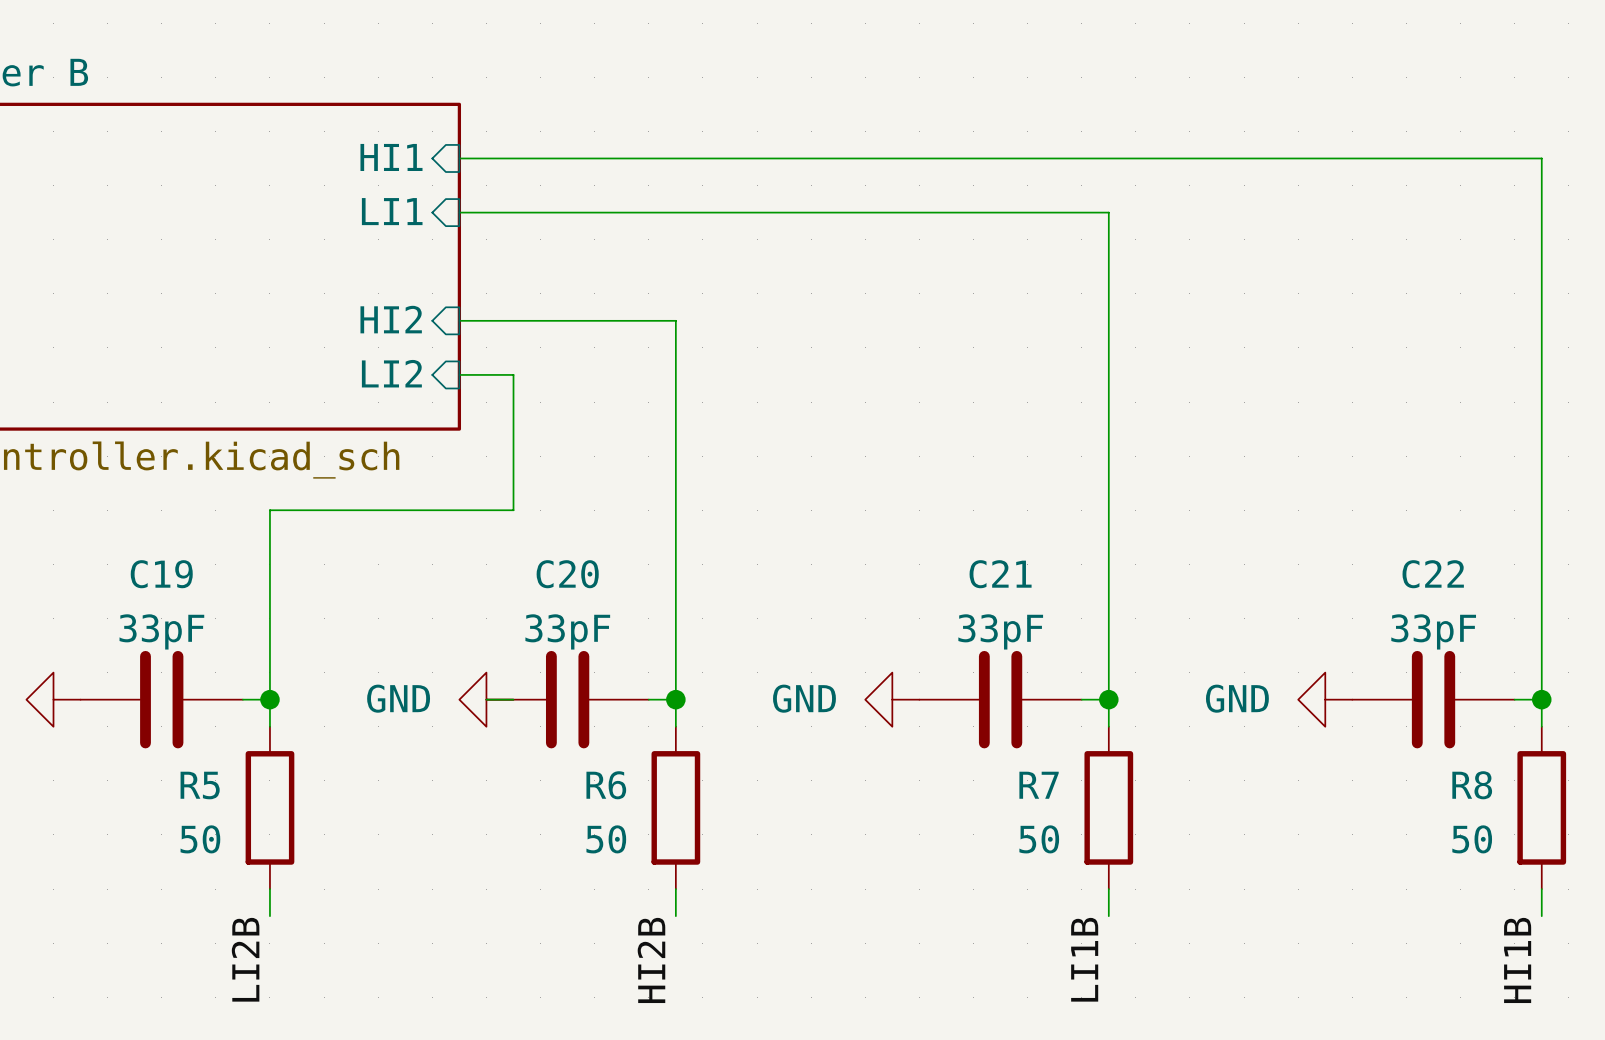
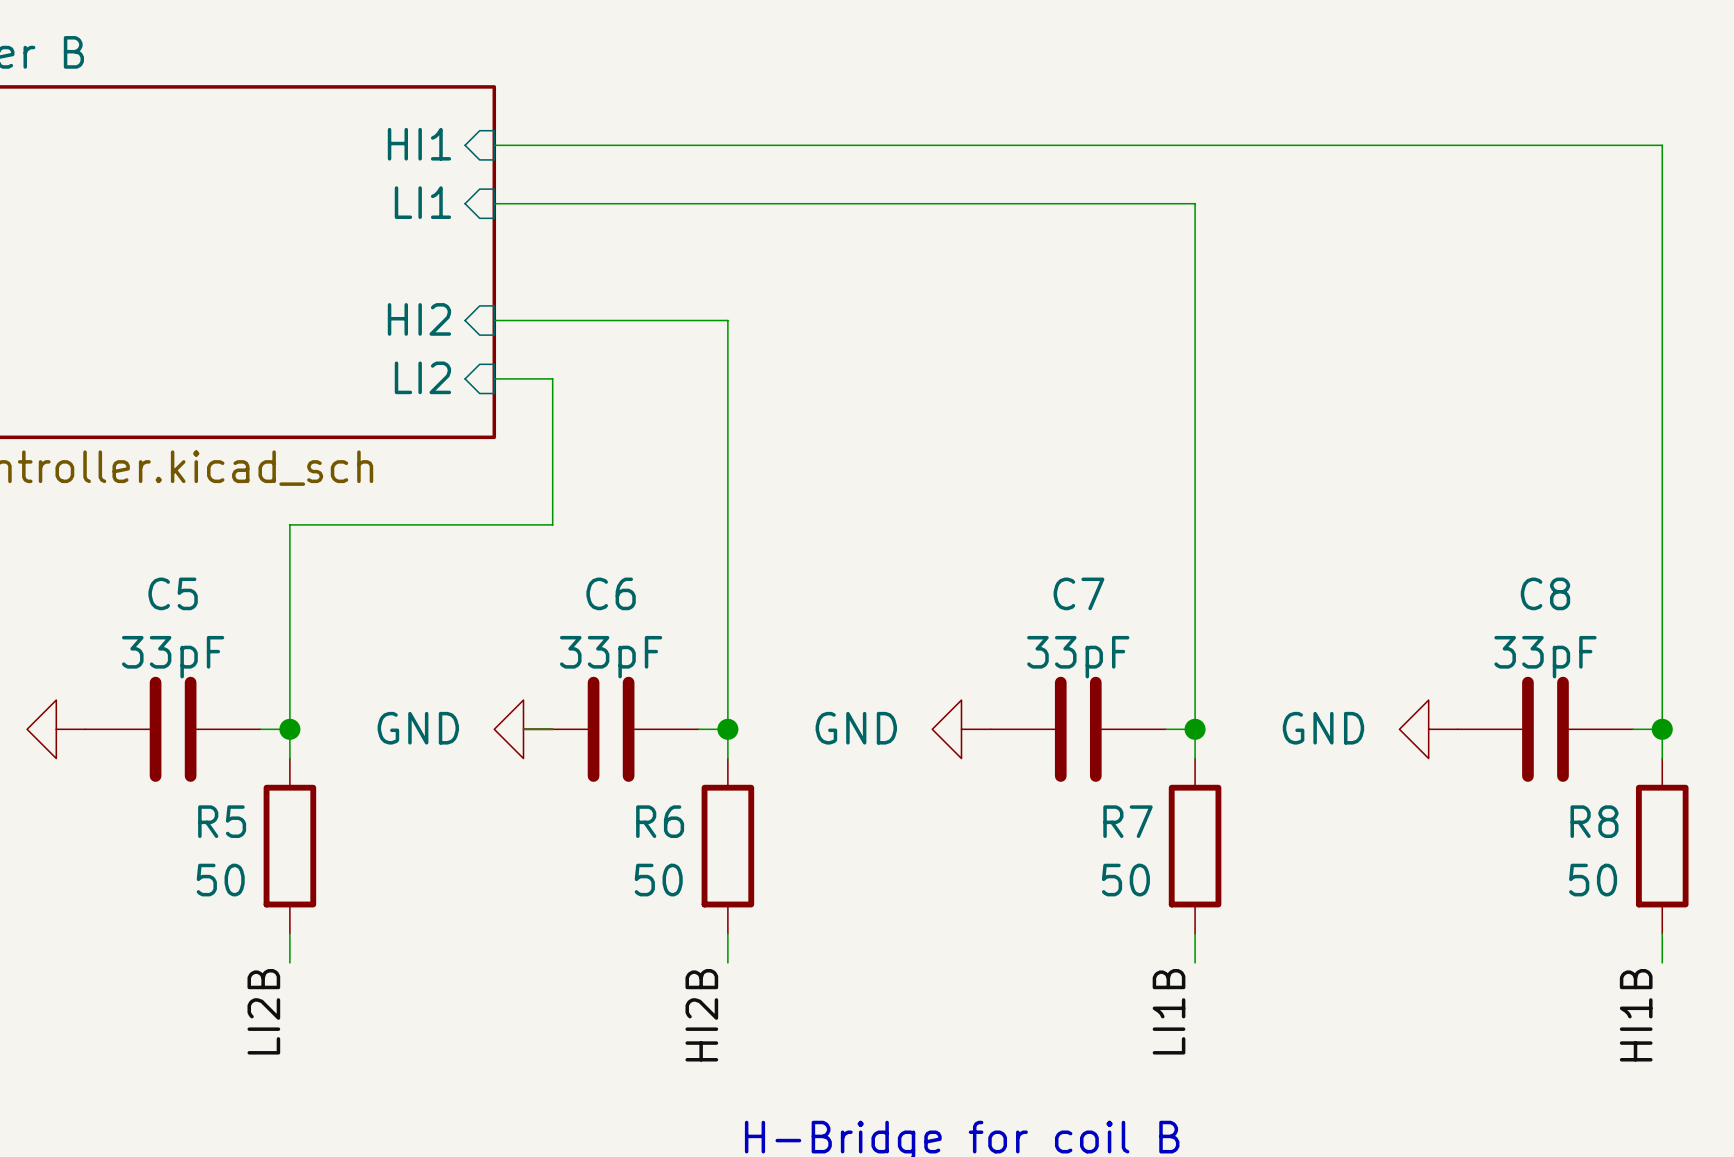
C19 name: C19 (161, 574) -> C5 (173, 593)
C20 name: C20 (567, 574) -> C6 (611, 593)
C21 name: C21 (1000, 574) -> C7 (1078, 593)
C22 name: C22 (1433, 574) -> C8 (1545, 593)

